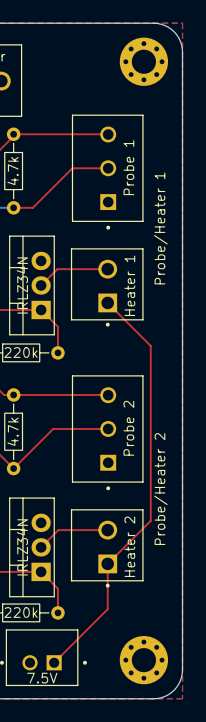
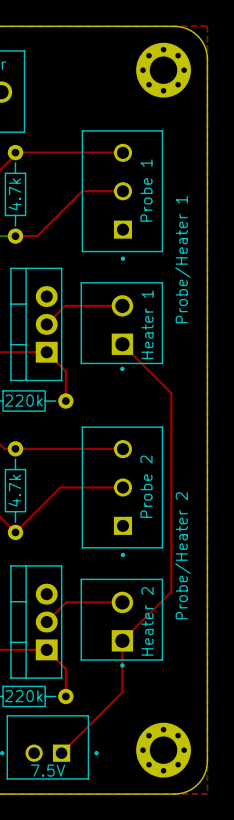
text: IRLZ34N (22, 285) -> none
text: IRLZ34N (22, 547) -> none

